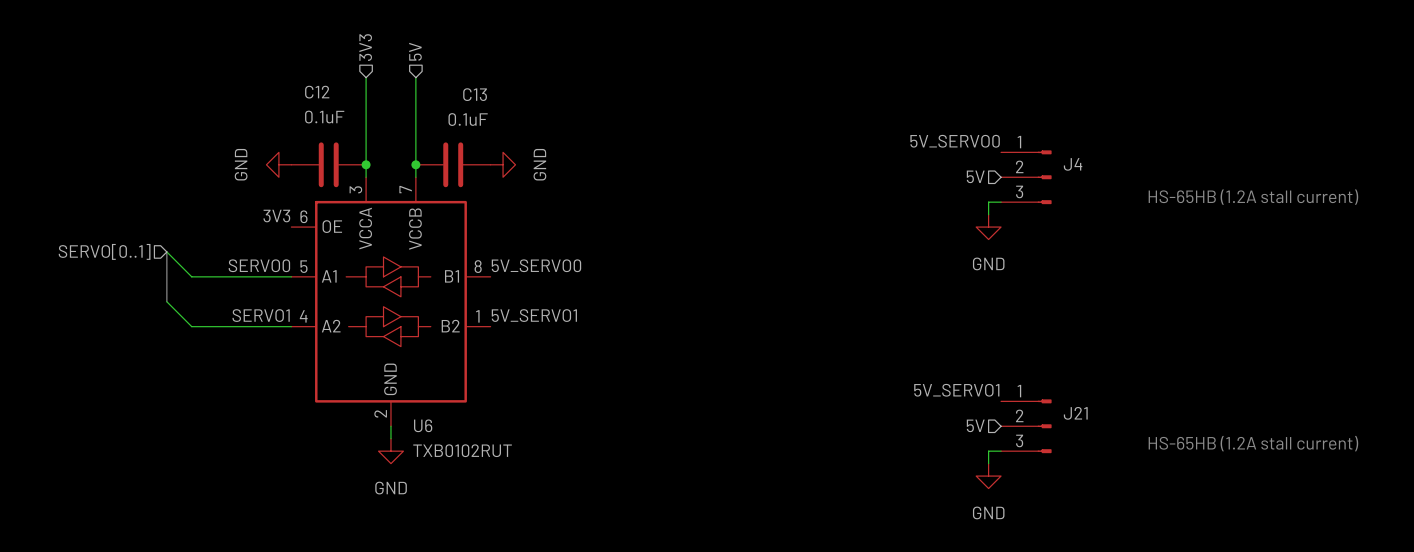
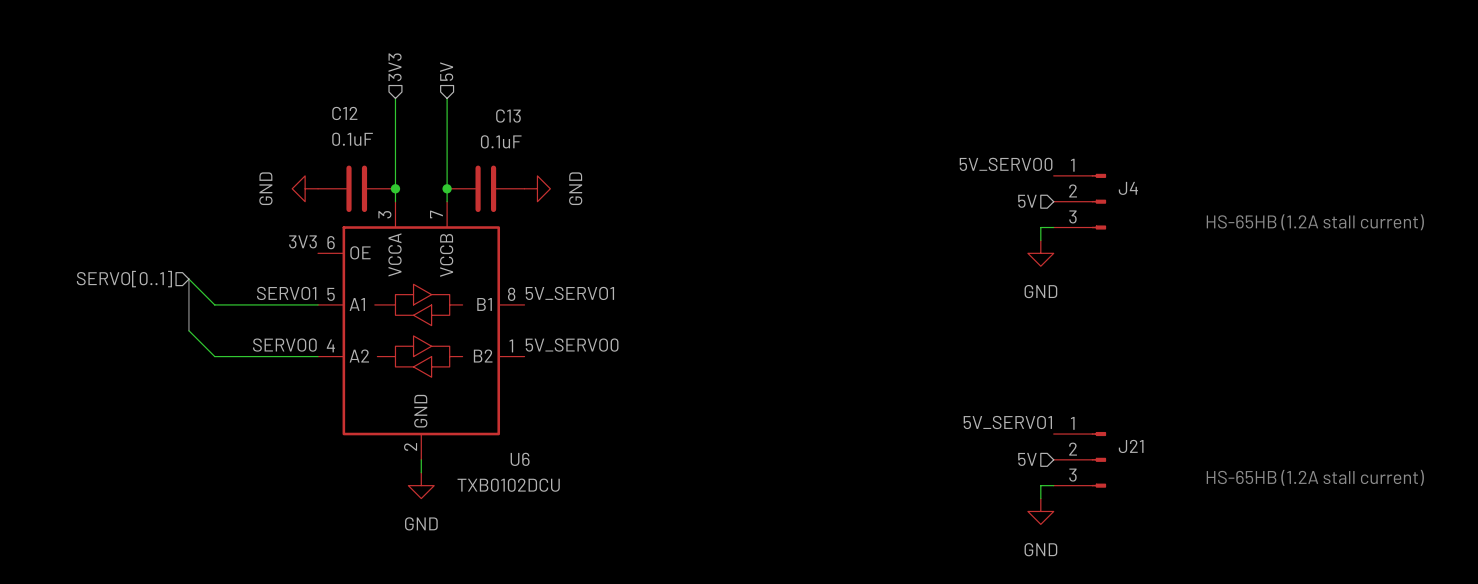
label: SERVO0 (259, 265) -> SERVO1 (286, 293)
label: 5V_SERVO0 (536, 265) -> 5V_SERVO1 (569, 293)
label: SERVO1 (261, 315) -> SERVO0 (284, 345)
label: 5V_SERVO1 (534, 315) -> 5V_SERVO0 (572, 345)
U6 name position: U6 (423, 425) -> U6 (520, 459)
U6 value: TXB0102RUT (462, 450) -> TXB0102DCU (508, 485)

